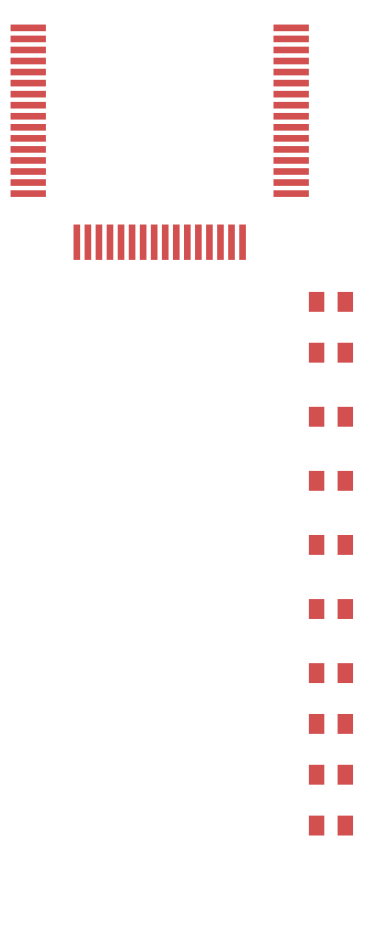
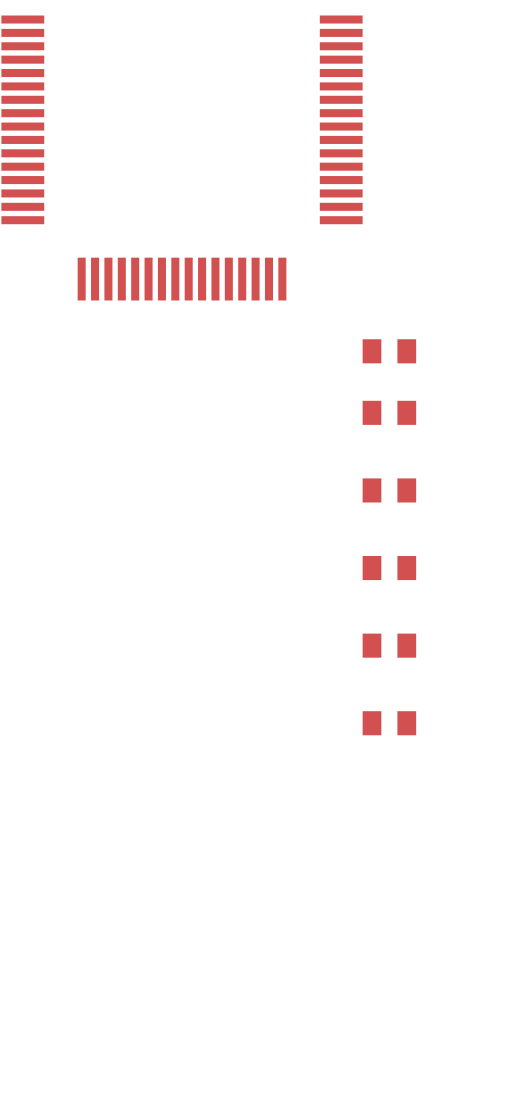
part: (330, 673) -> none
part: (330, 723) -> none
part: (330, 774) -> none
part: (330, 825) -> none

